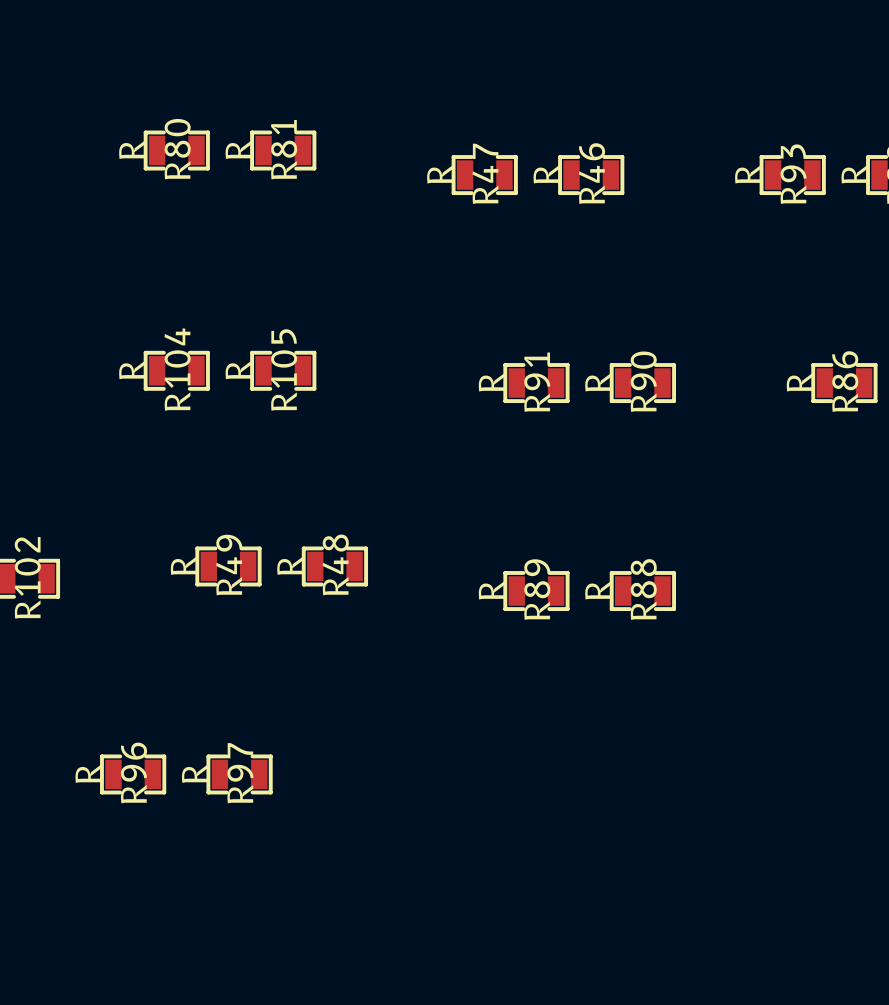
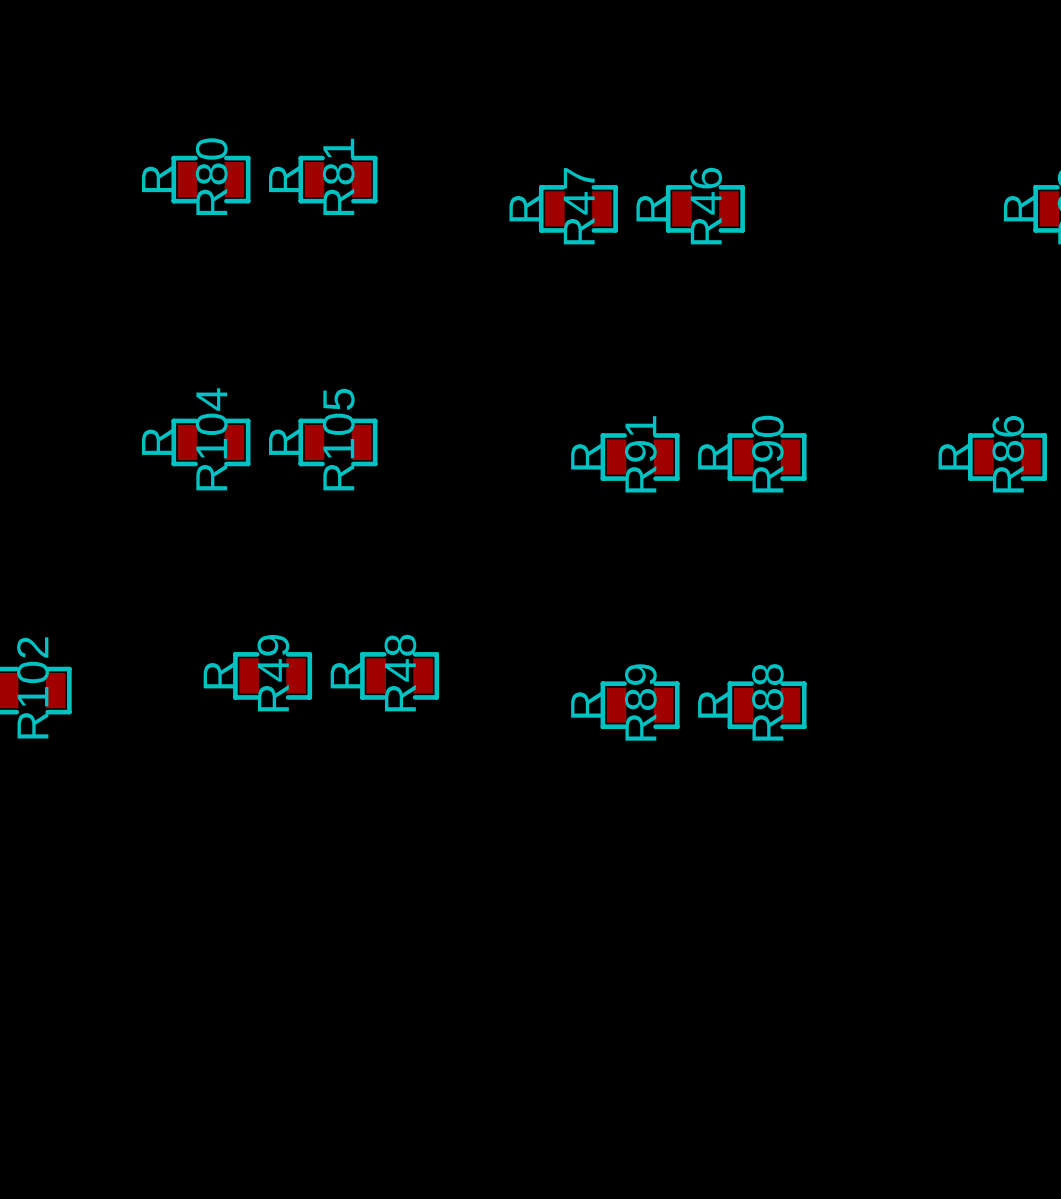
R93: R (792, 175) -> none
R96: R (133, 774) -> none
R97: R (239, 774) -> none

